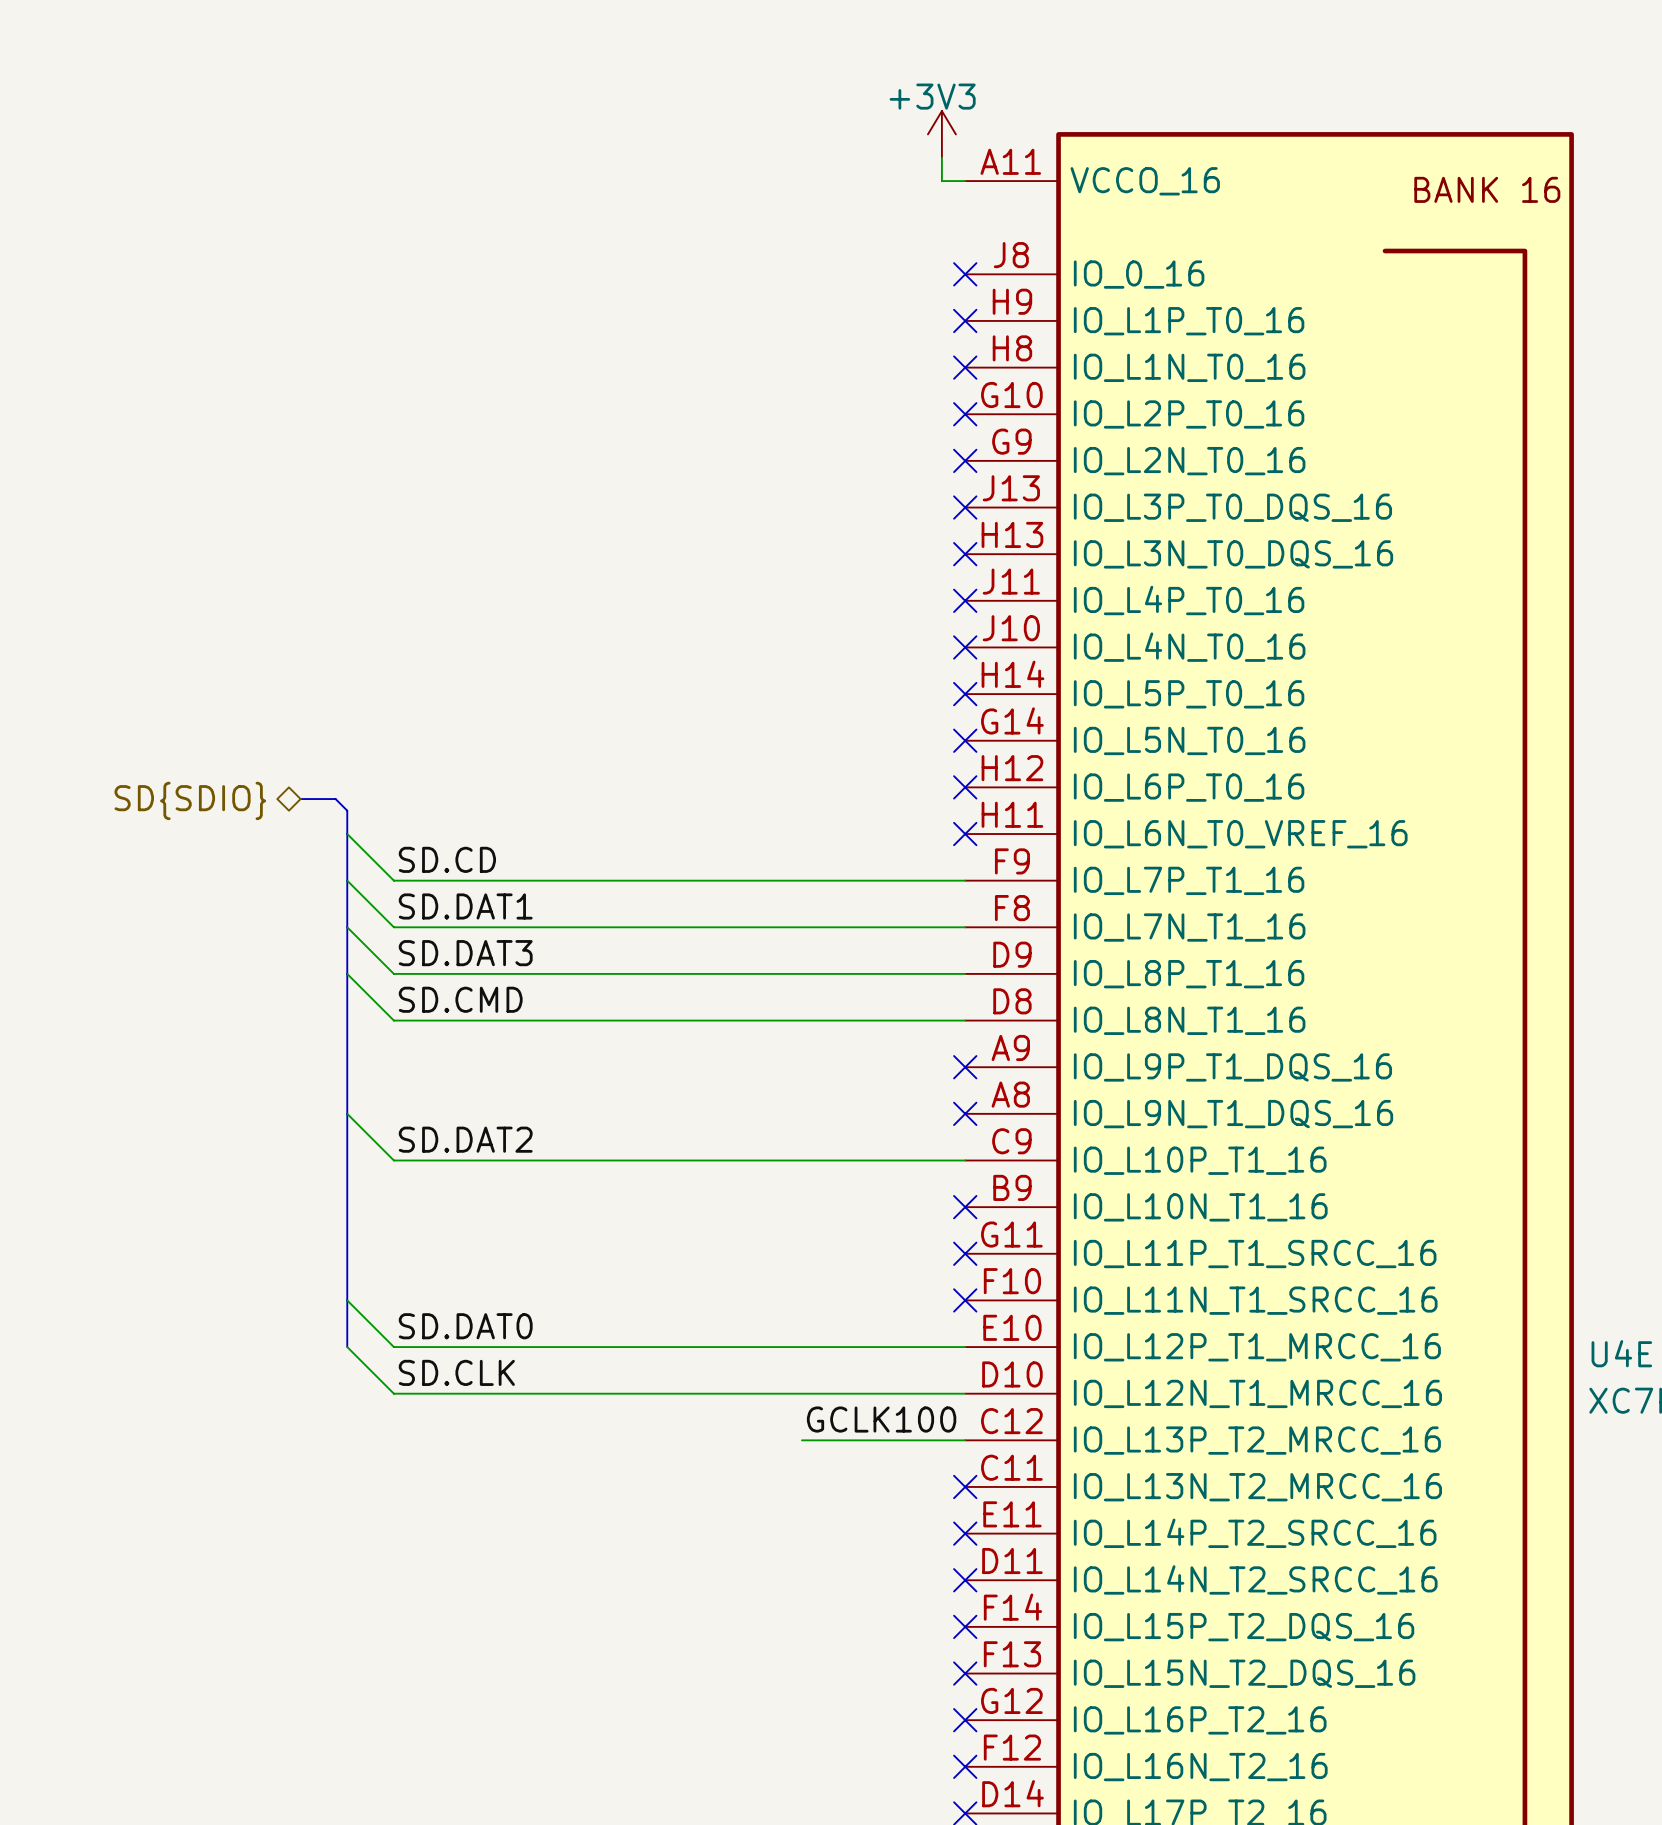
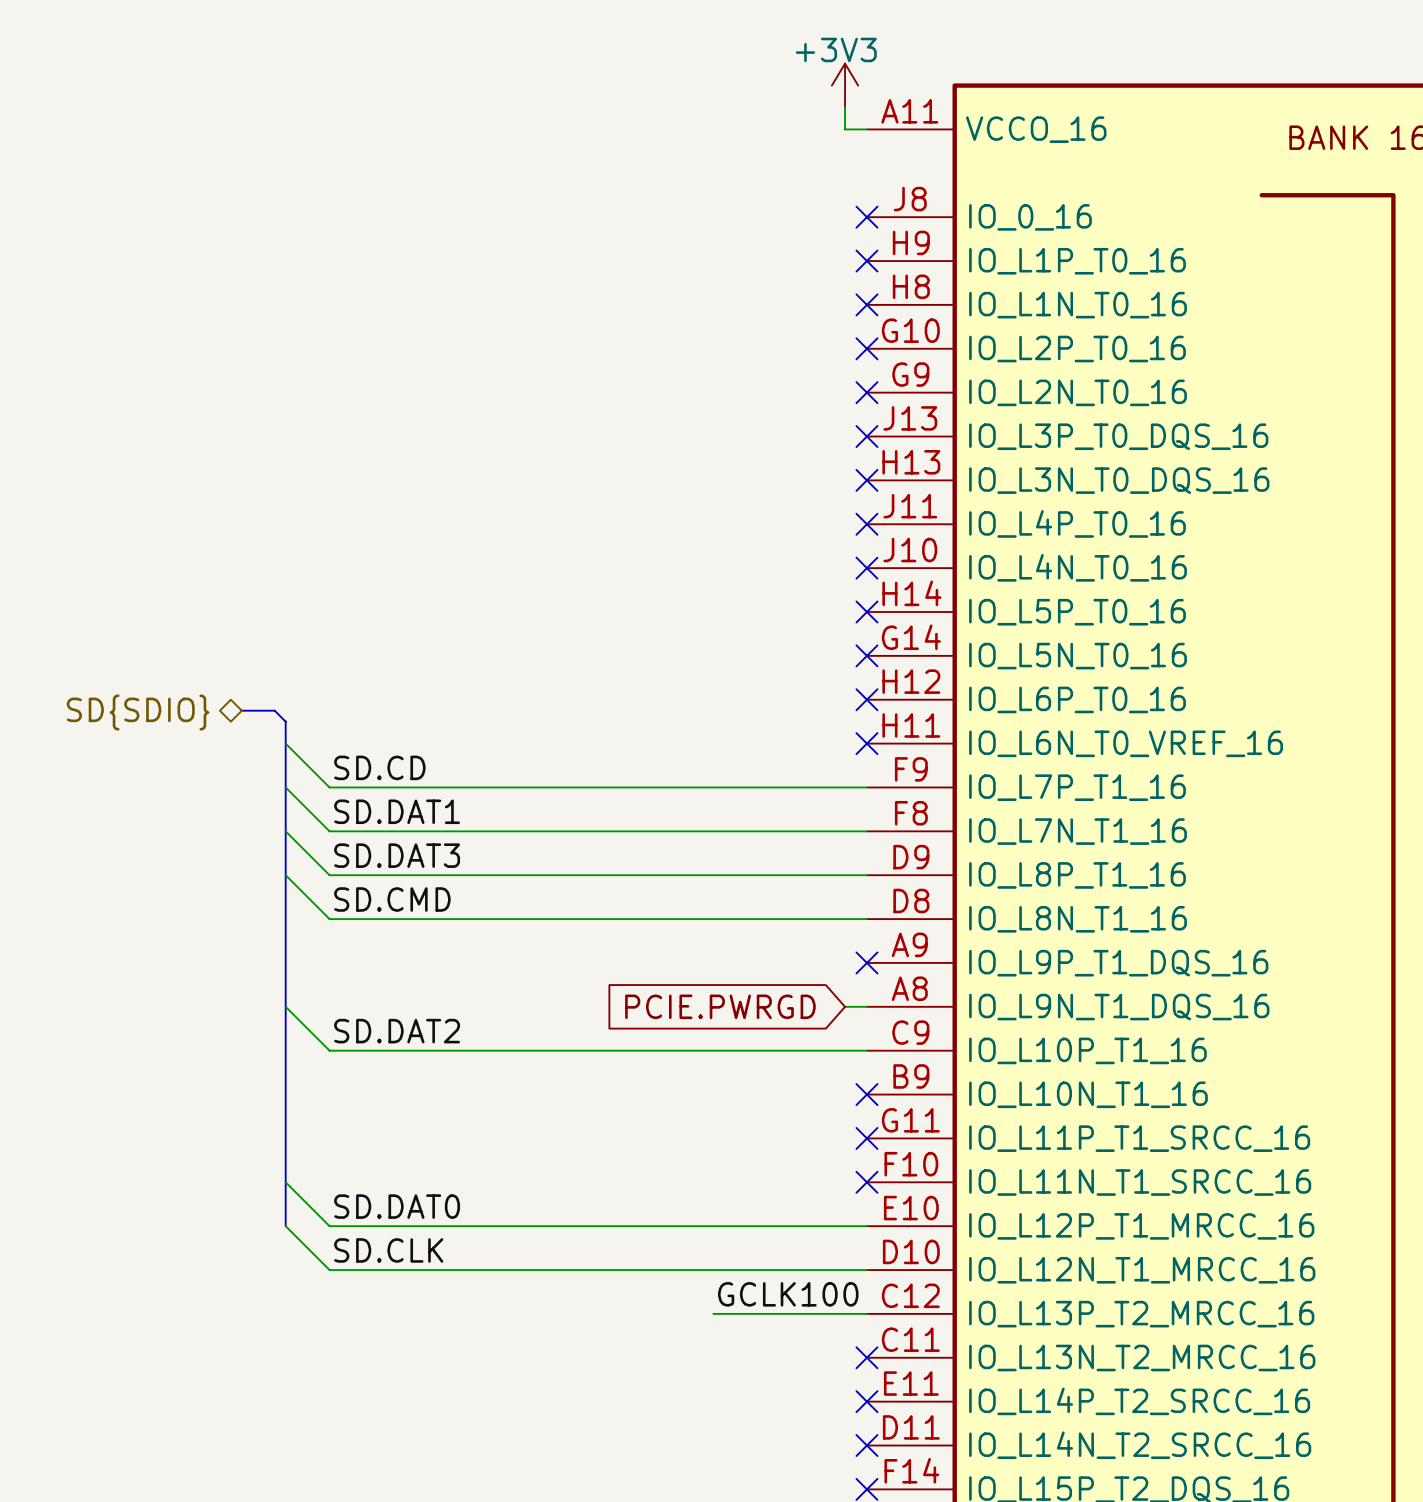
global label: none -> PCIE.PWRGD (720, 1006)
wire: none -> (845, 1006) (866, 1006)
no-connect mark: (965, 1113) -> none

